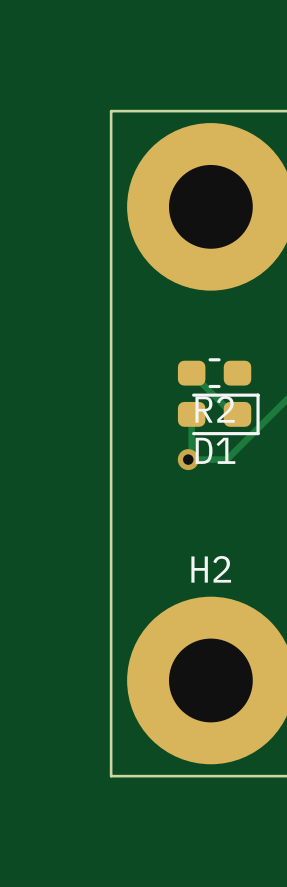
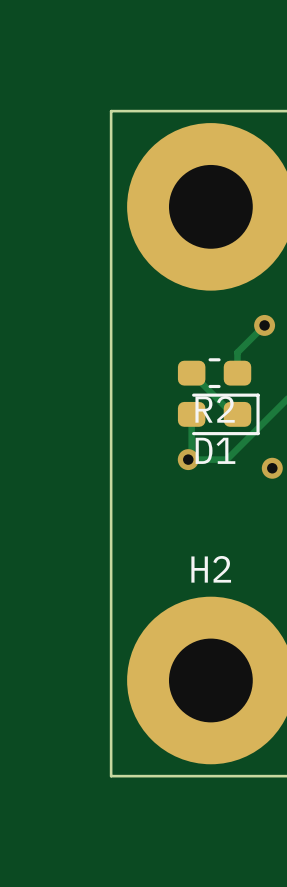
track: none -> (264, 325) (237, 352) (237, 373)
via: none -> (264, 325)
via: none -> (272, 468)

